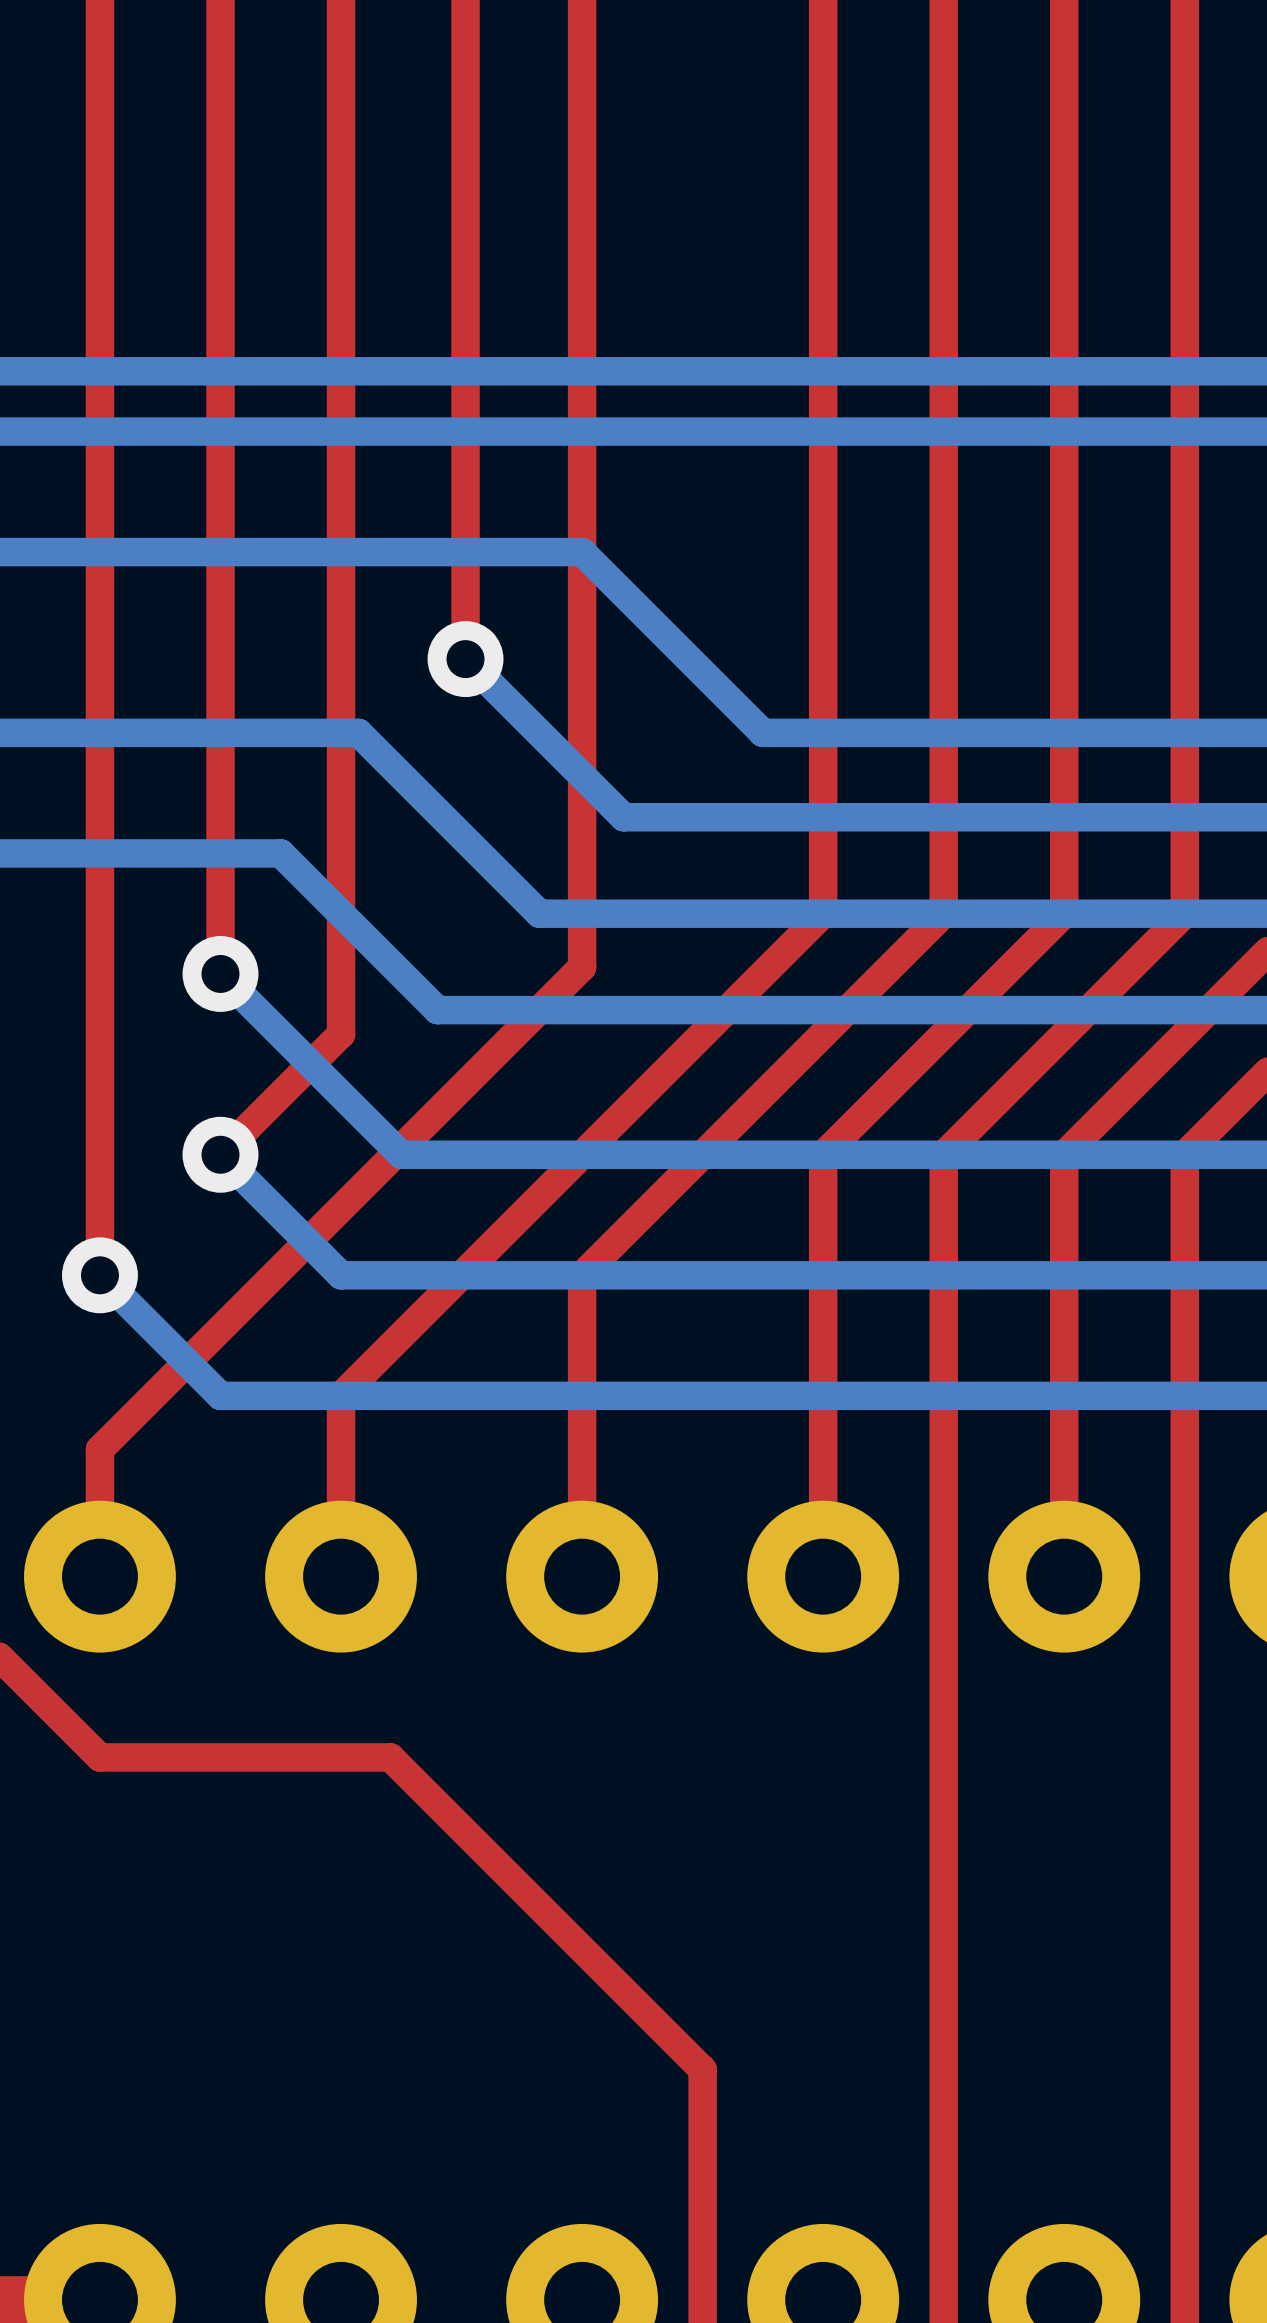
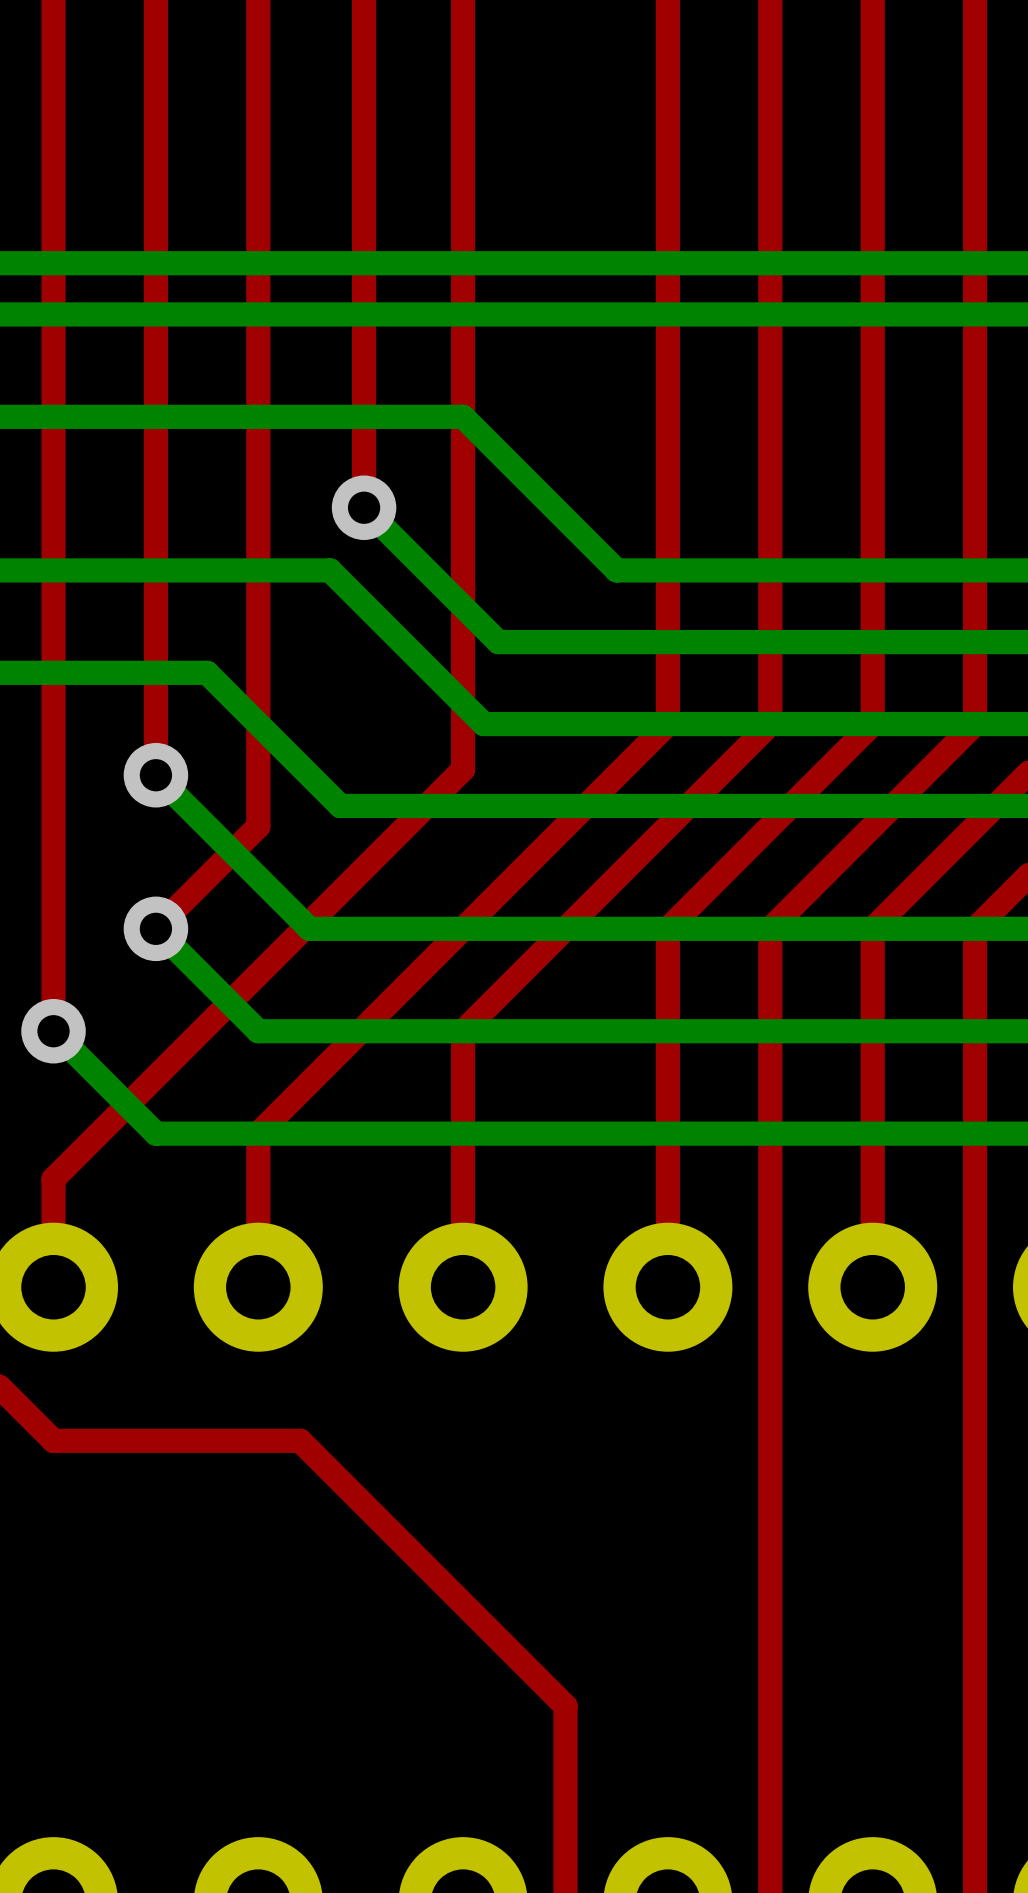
bottom track: (358, 732) (539, 913) (606, 913) -> (273, 570) (330, 570) (483, 724)

